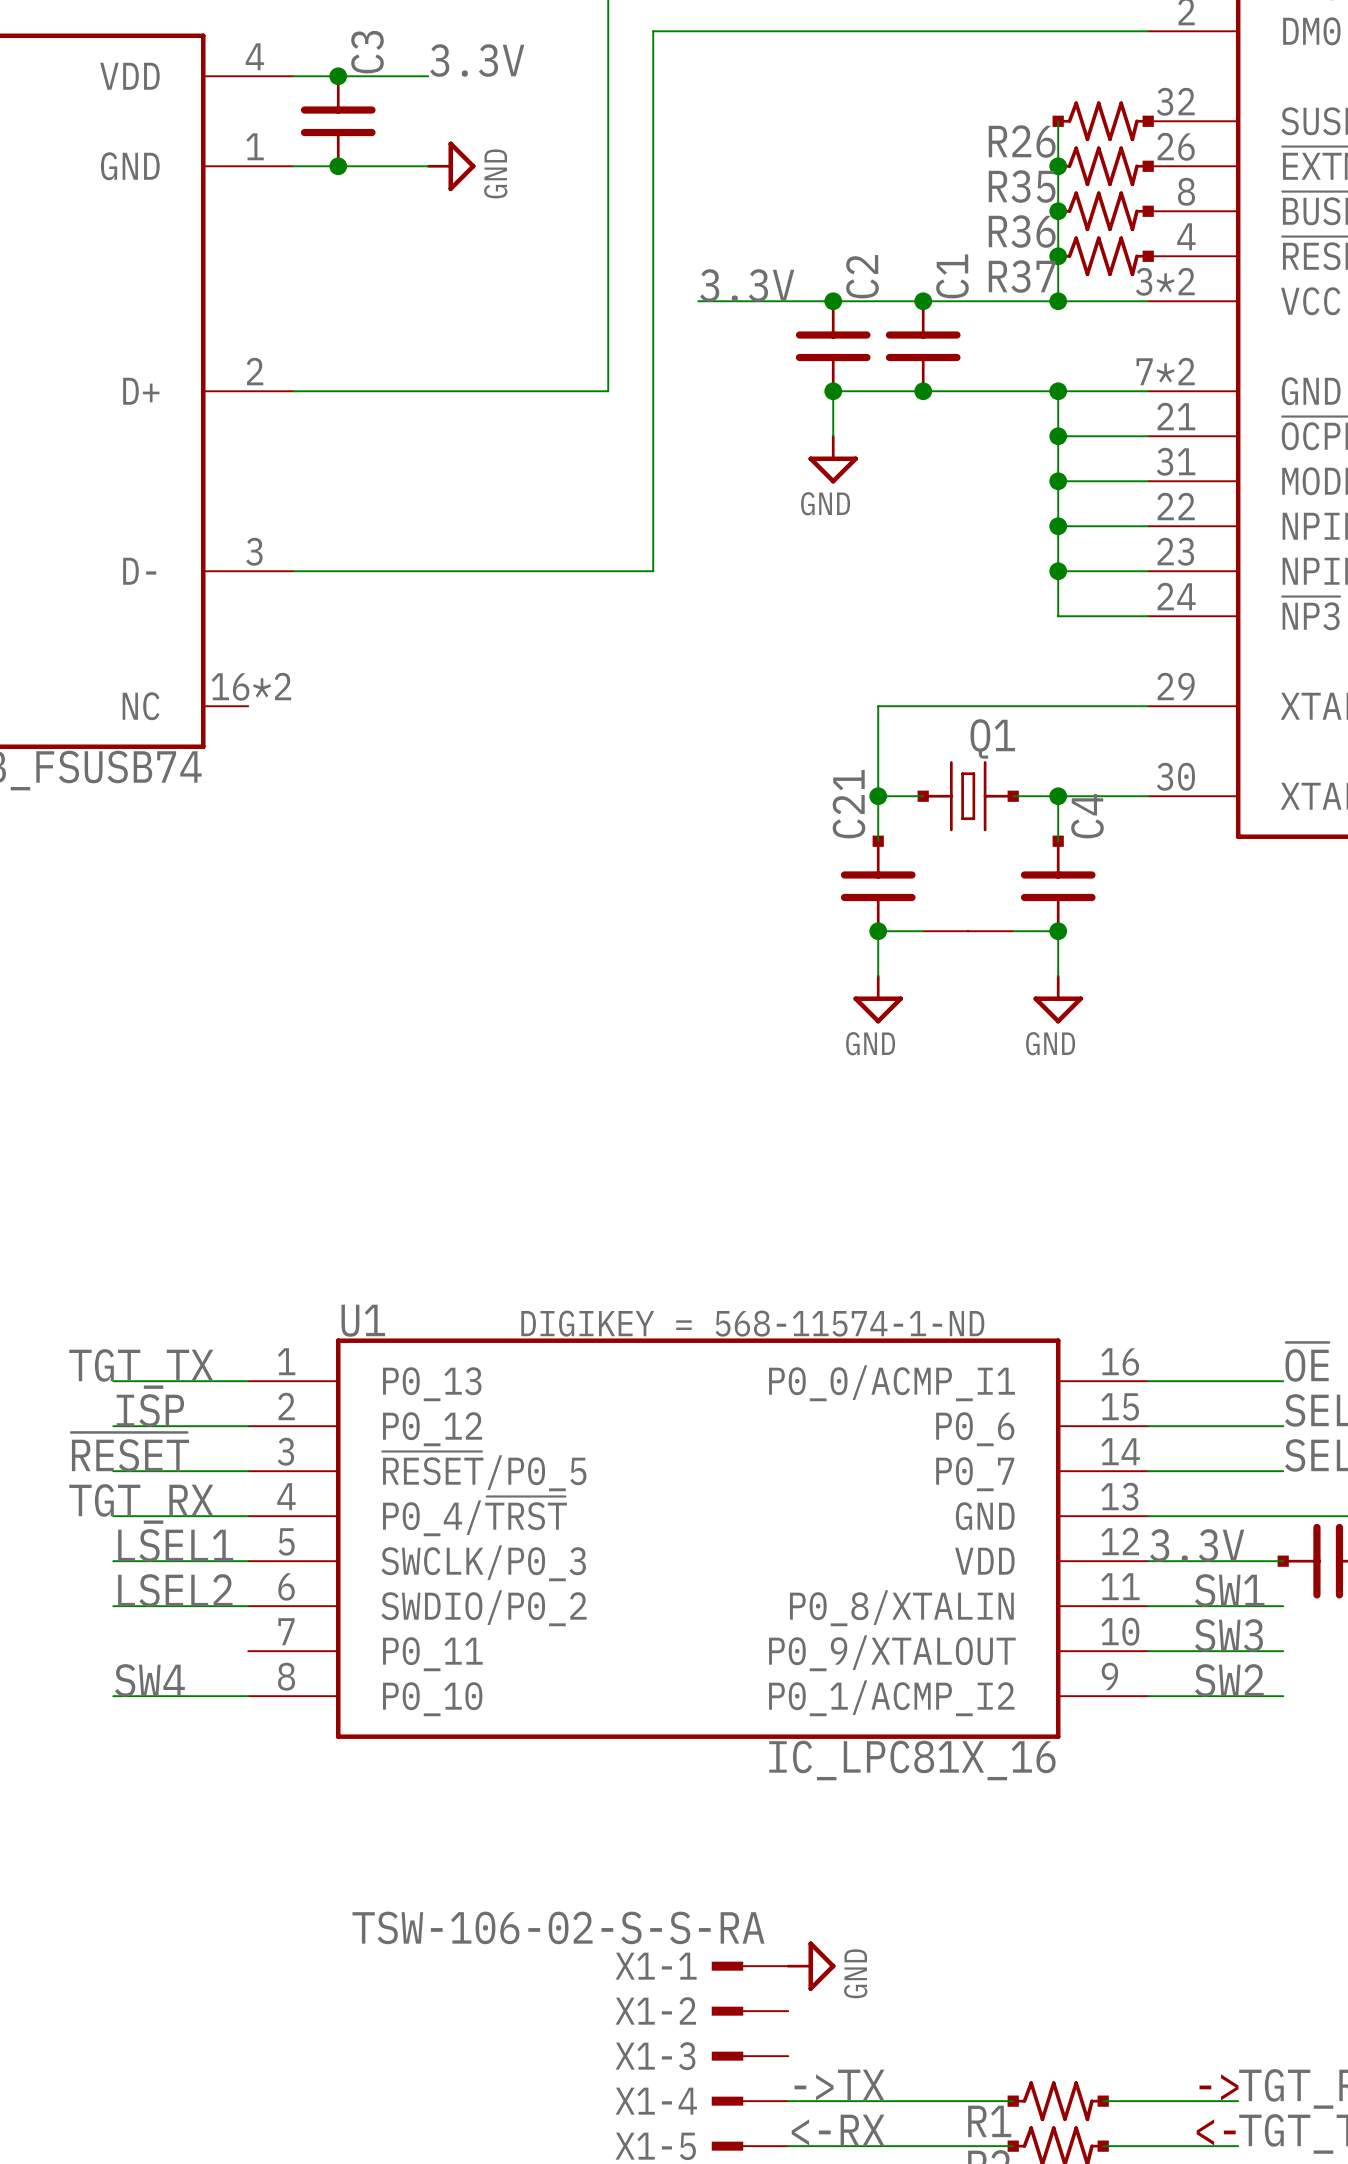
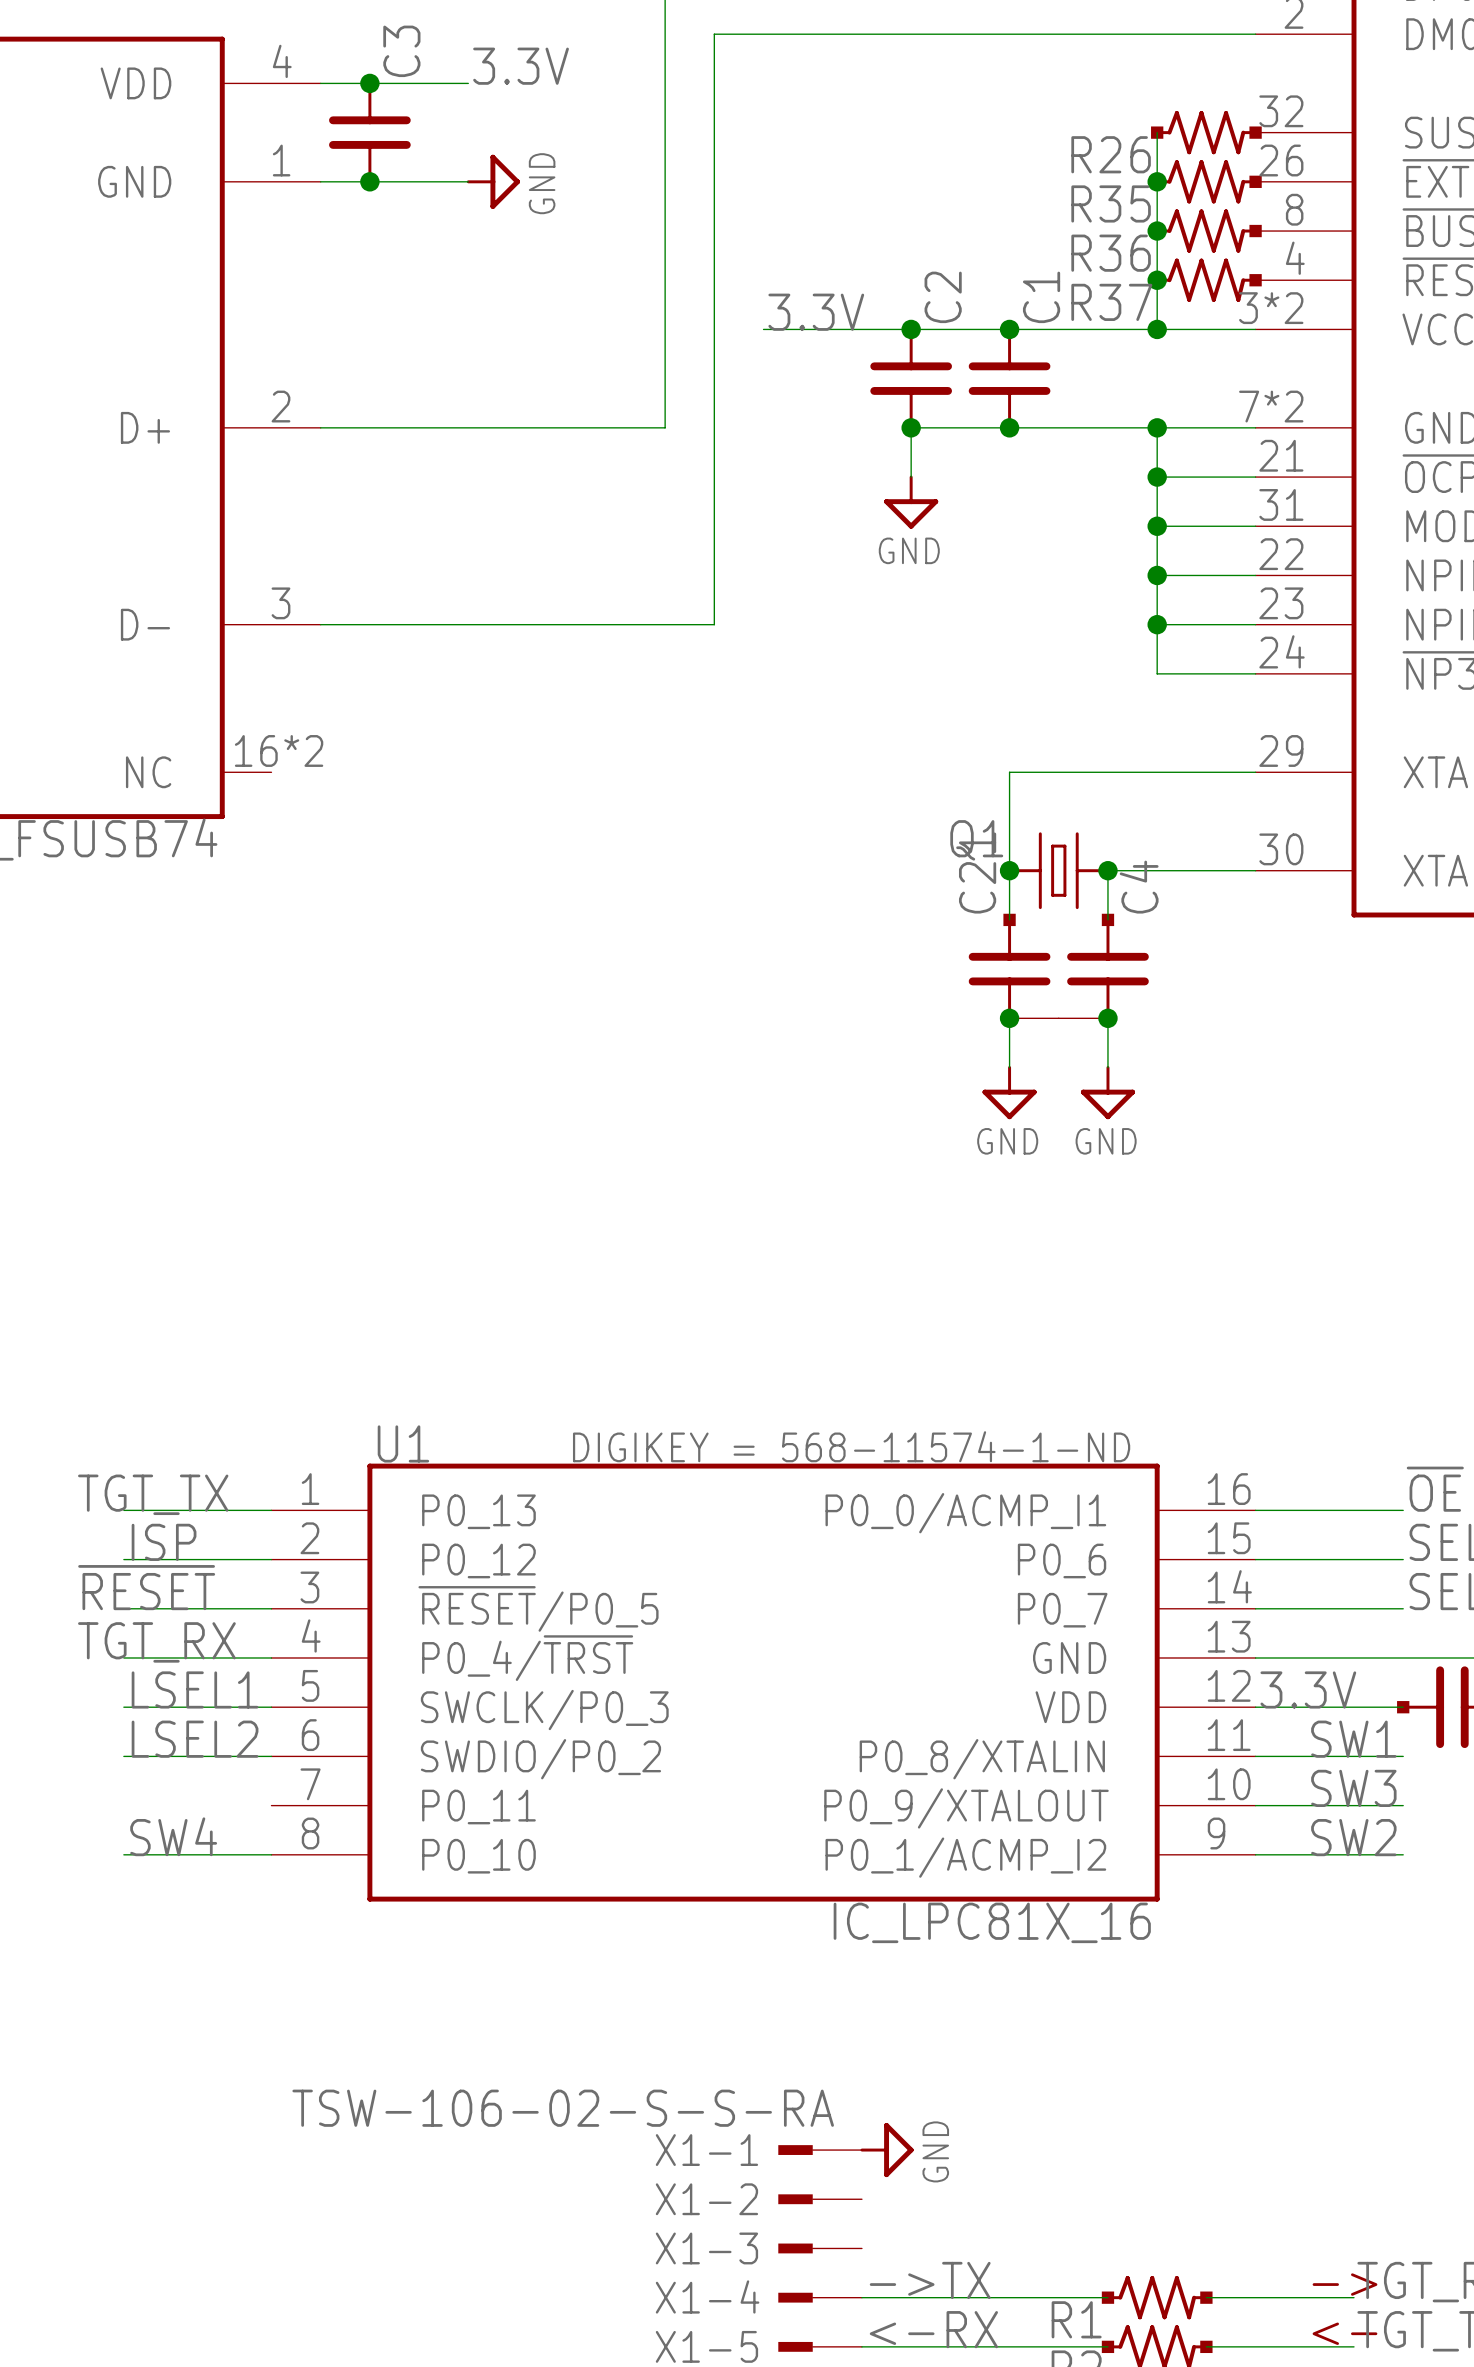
wire: (923, 706) (878, 706) (878, 841) -> (1009, 772) (1009, 919)
Q1 name position: Q1 (992, 738) -> Q1 (976, 840)
wire: (878, 796) (923, 796) -> none
junction position: (878, 796) -> (1009, 870)
wire: (1058, 796) (1058, 841) -> (1107, 870) (1107, 919)
junction position: (1058, 796) -> (1107, 870)
C21 position: (878, 886) -> (1009, 969)
C4 position: (1058, 886) -> (1107, 969)
junction position: (878, 931) -> (1009, 1018)
wire: (923, 931) (878, 931) (878, 976) -> (1009, 1018) (1009, 1067)
wire: (1013, 931) (1058, 931) (1058, 976) -> (1107, 1018) (1107, 1067)
junction position: (1058, 931) -> (1107, 1018)
power symbol position: GND (878, 999) -> GND (1009, 1092)
power symbol position: GND (1058, 999) -> GND (1107, 1092)

